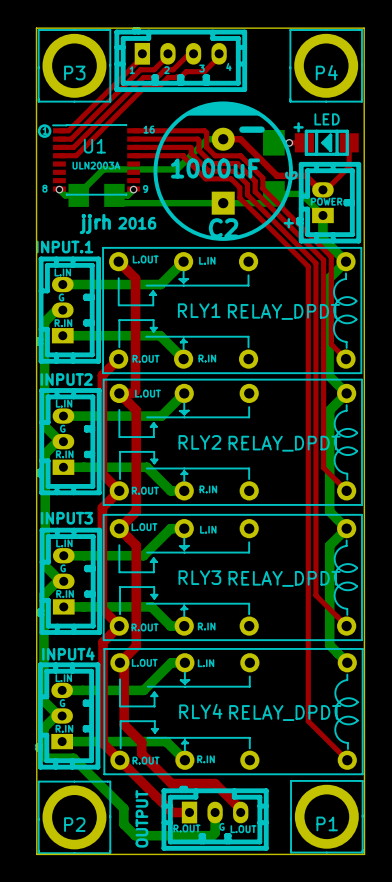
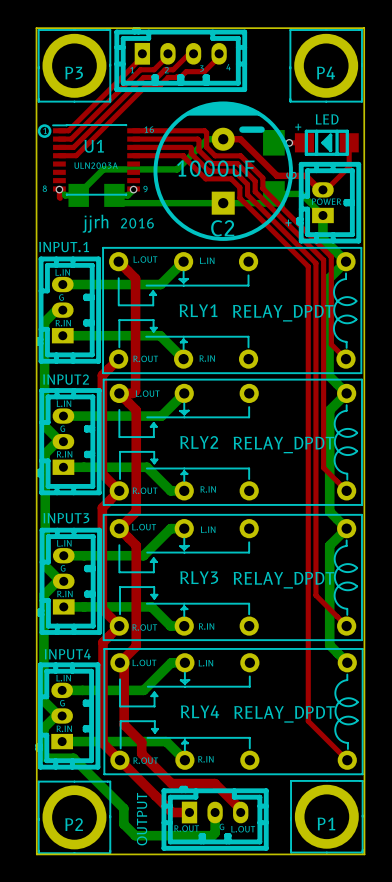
top track: none -> (59, 188) (60, 198)

